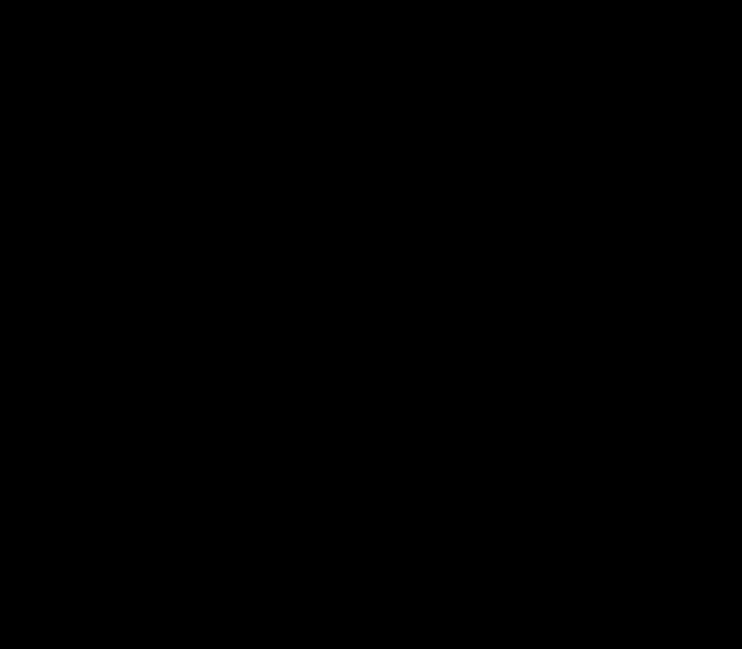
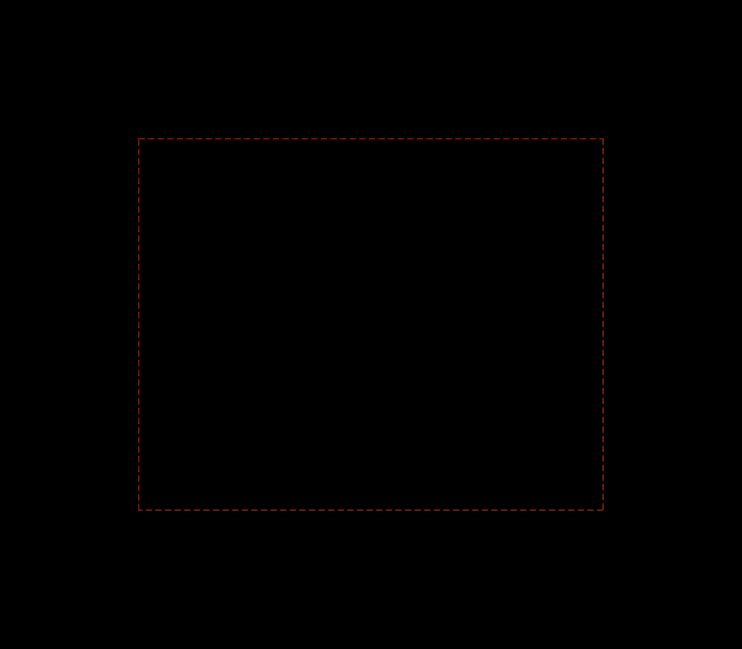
top zone outline: none -> (138, 138) (603, 138) (603, 510) (138, 510) (138, 138)

